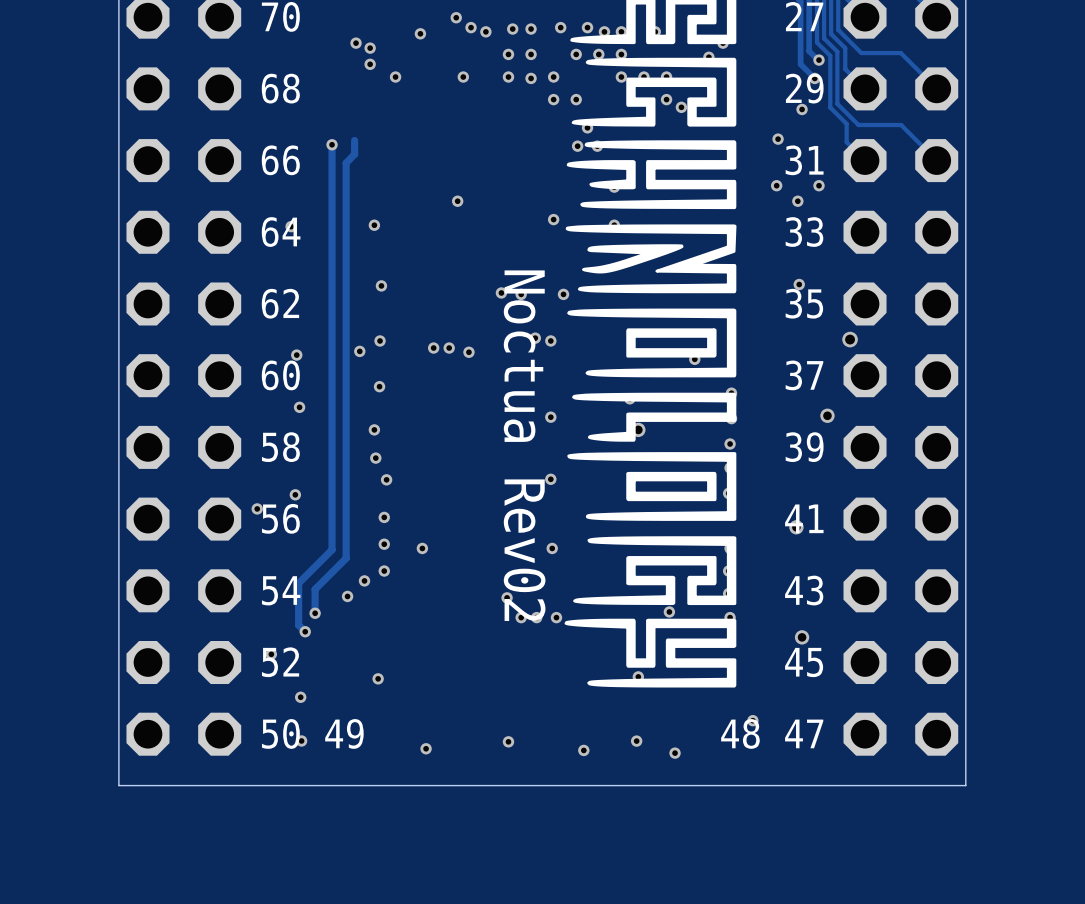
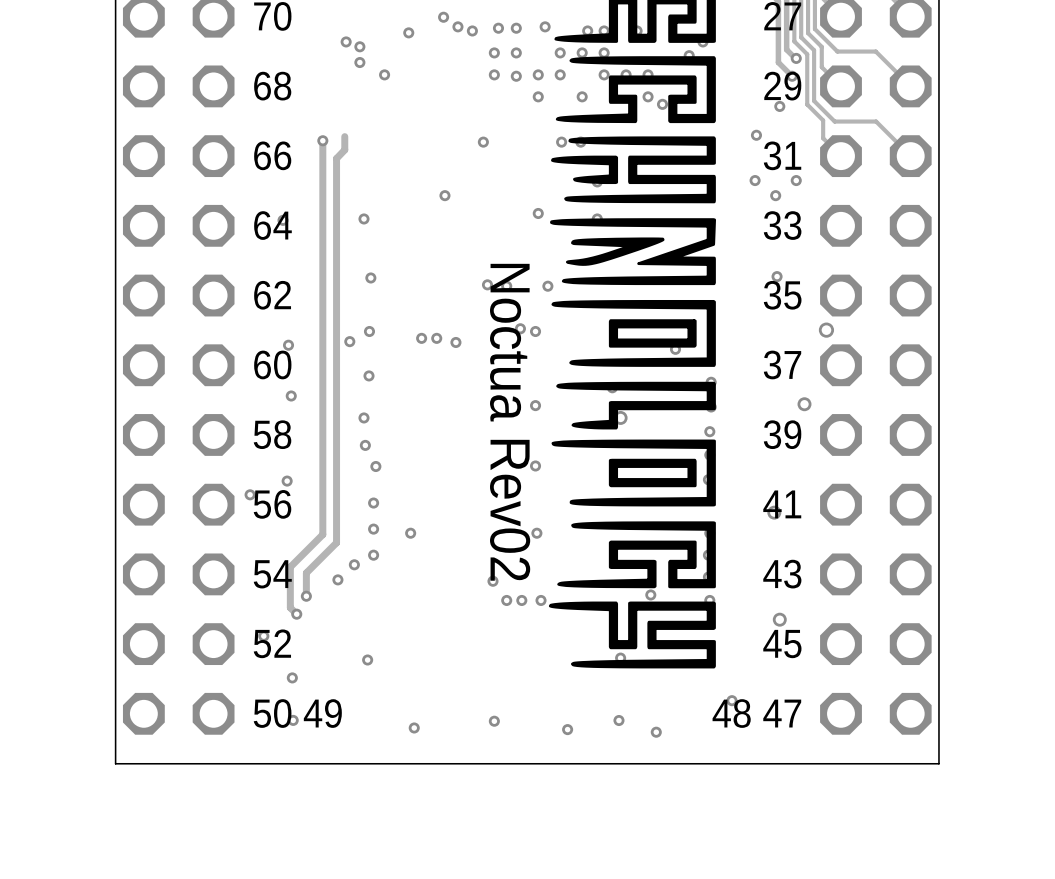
via: (587, 27) -> none
via: (463, 77) -> none
via: none -> (560, 74)
via: (576, 99) -> none
via: none -> (582, 96)
via: (587, 127) -> none
via: none -> (483, 142)

